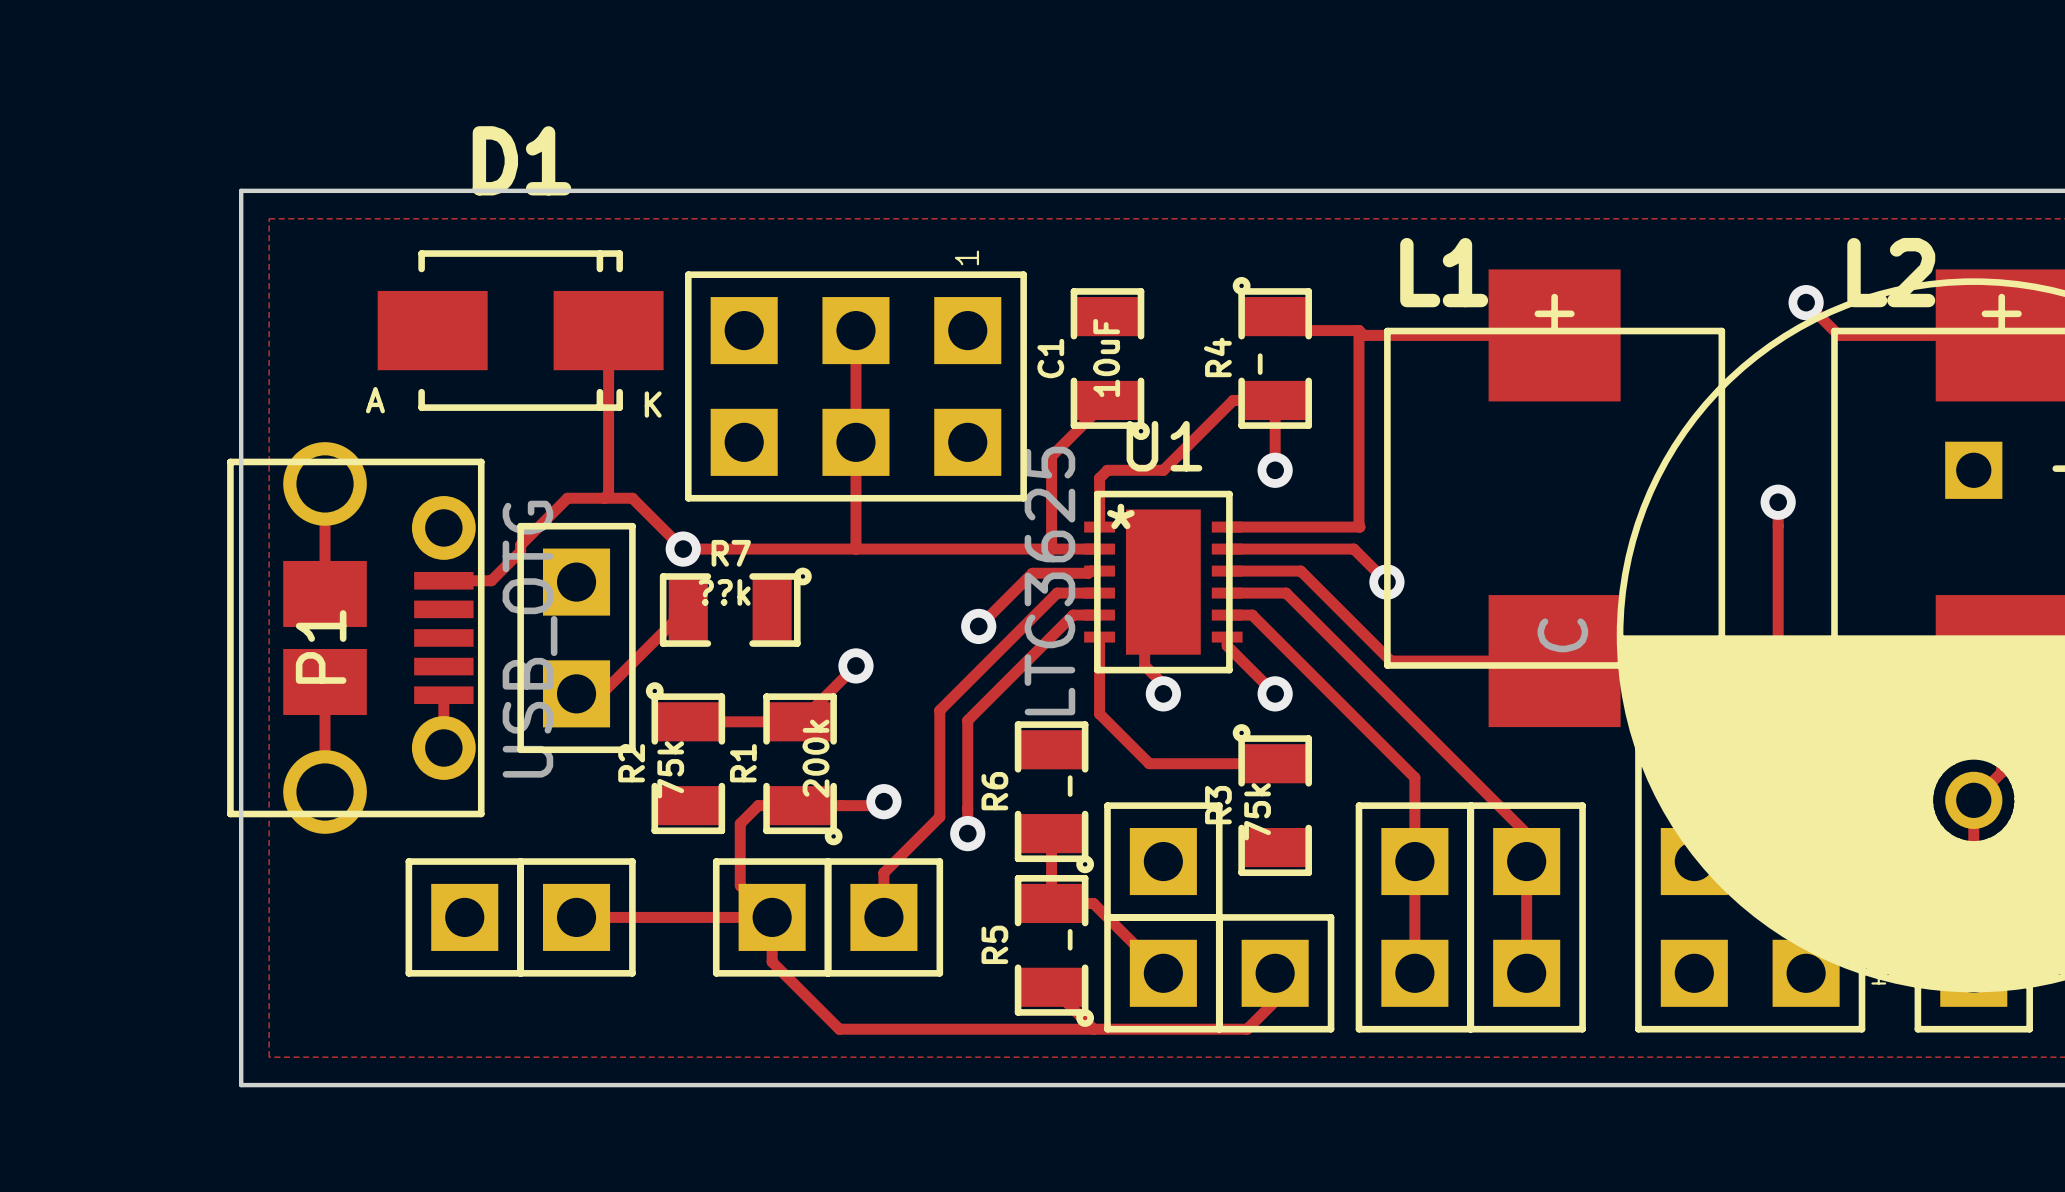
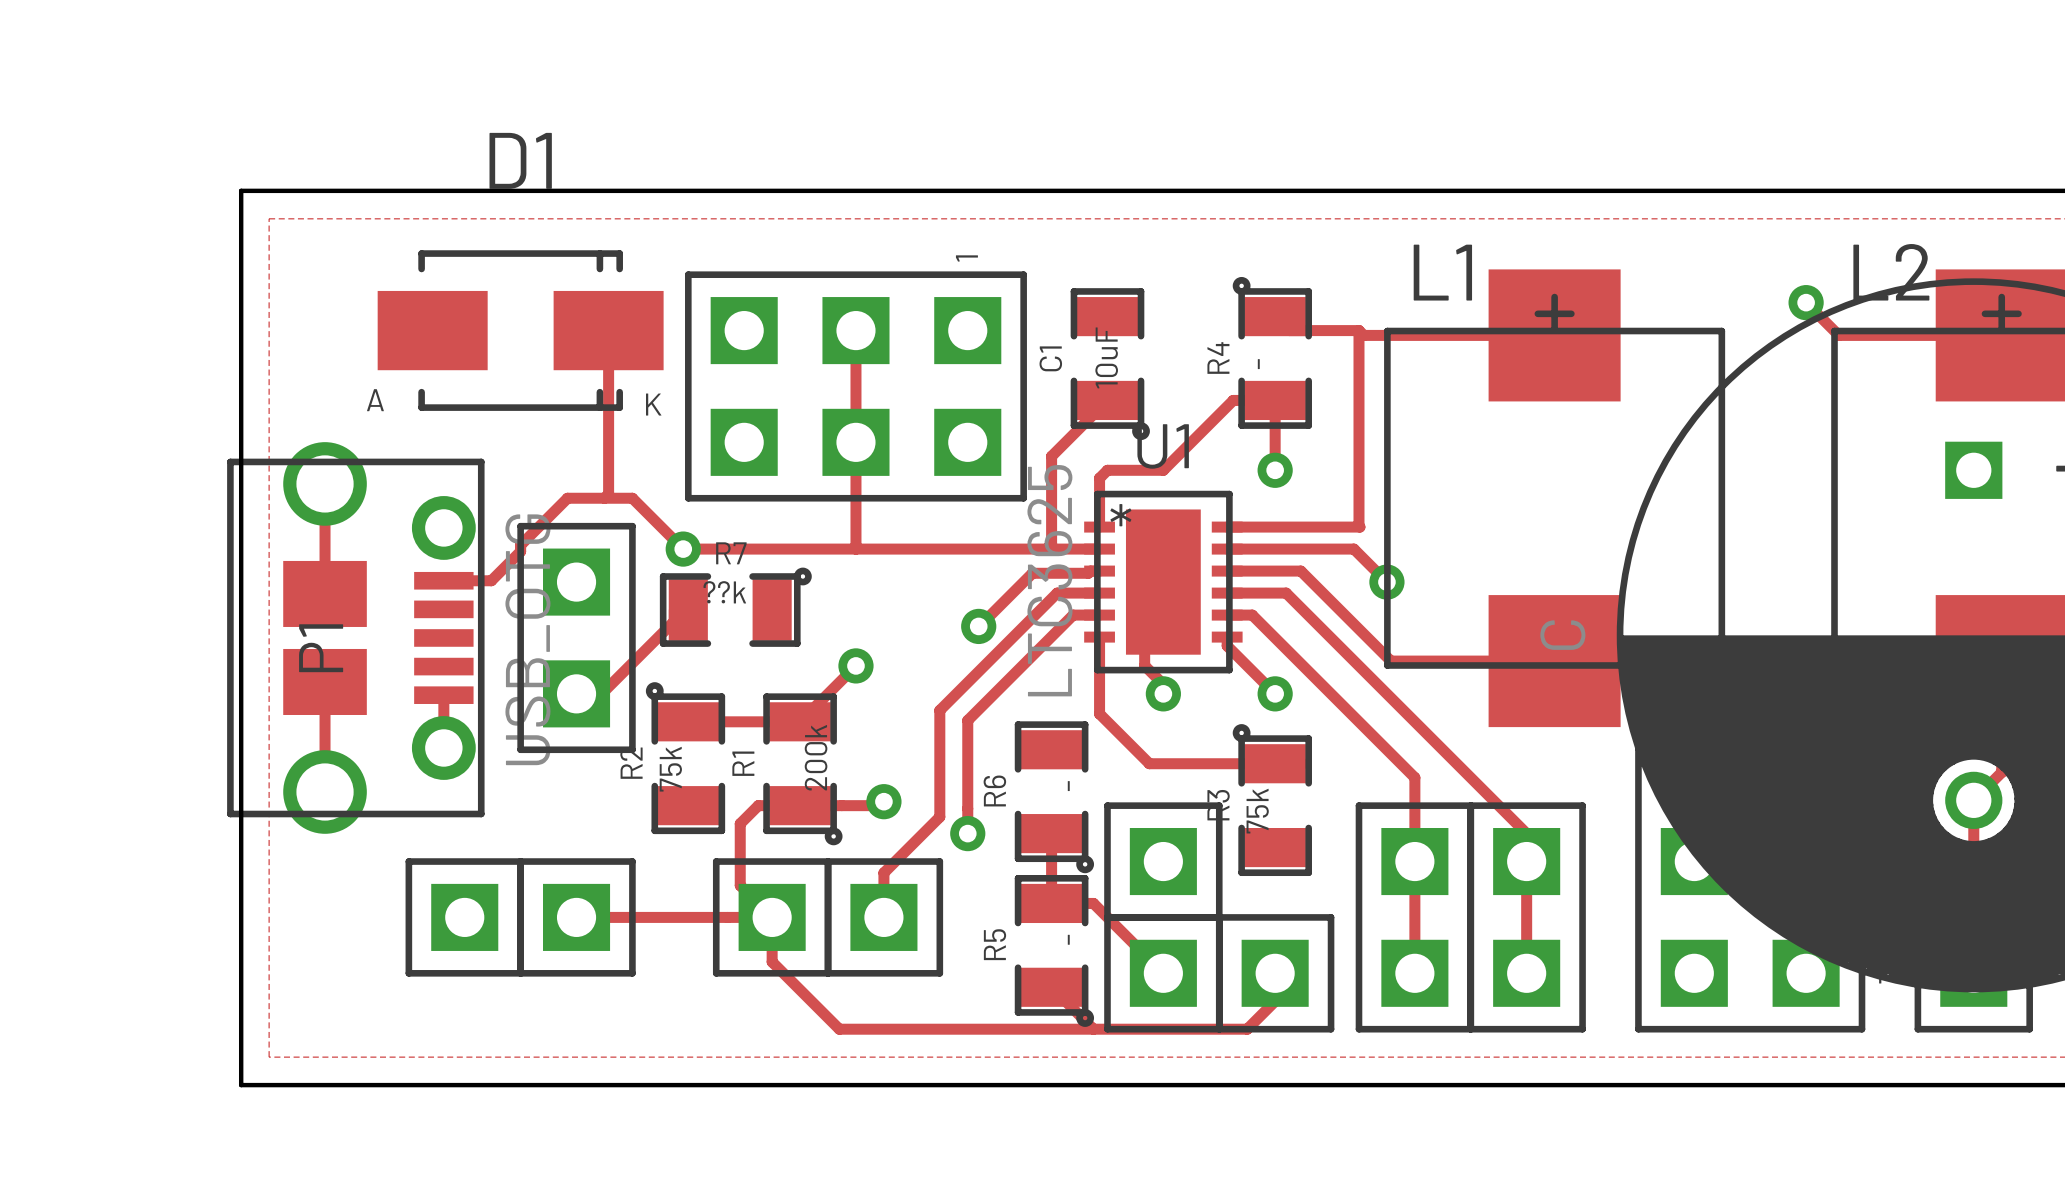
track: (1778, 502) (1778, 661) -> none
via: (1778, 502) -> none

